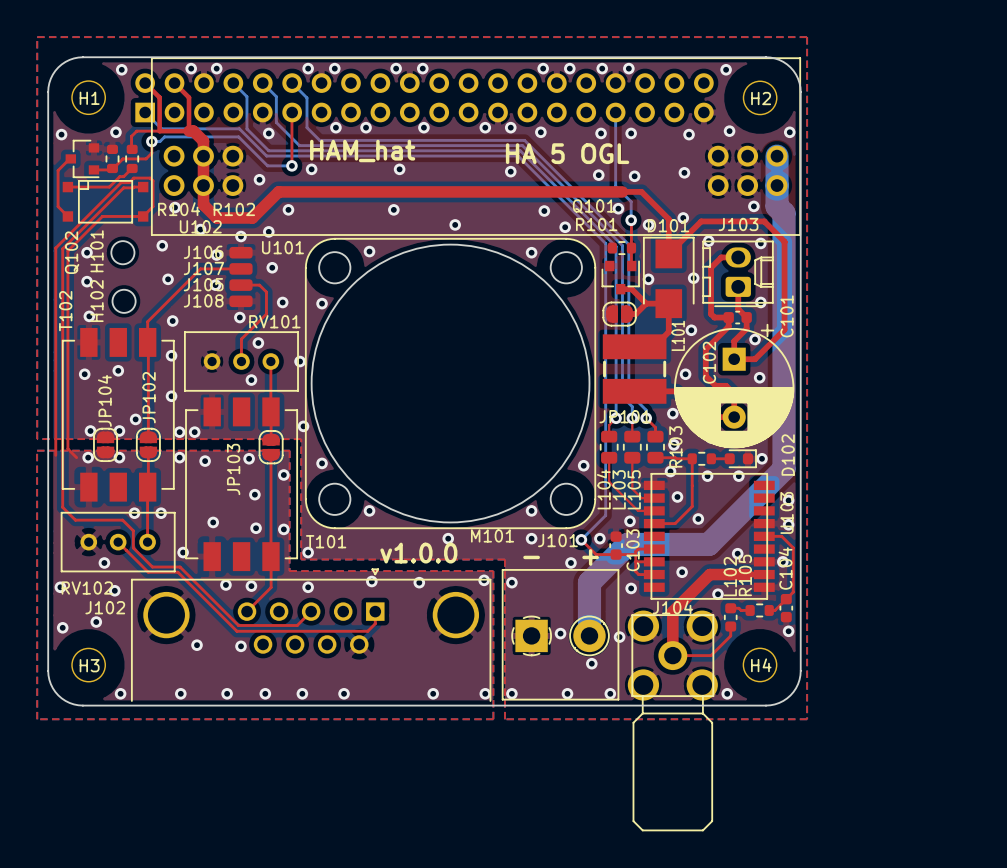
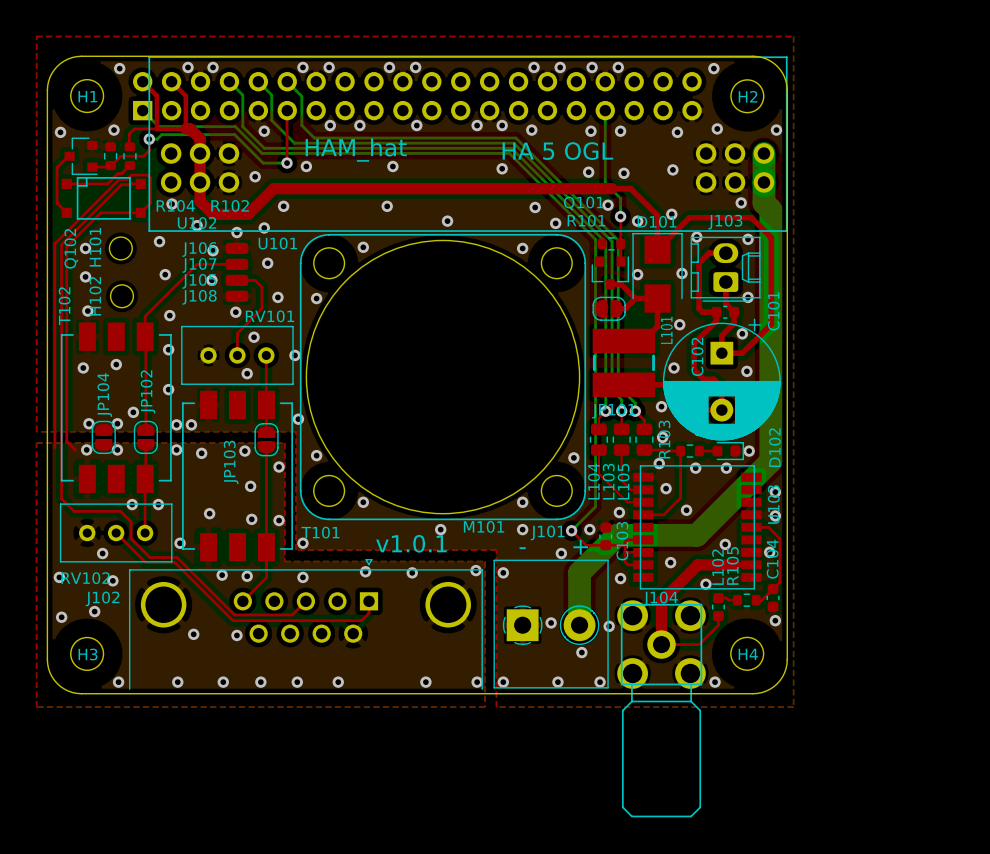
text: v1.0.0 (418, 553) -> v1.0.1 (411, 543)

